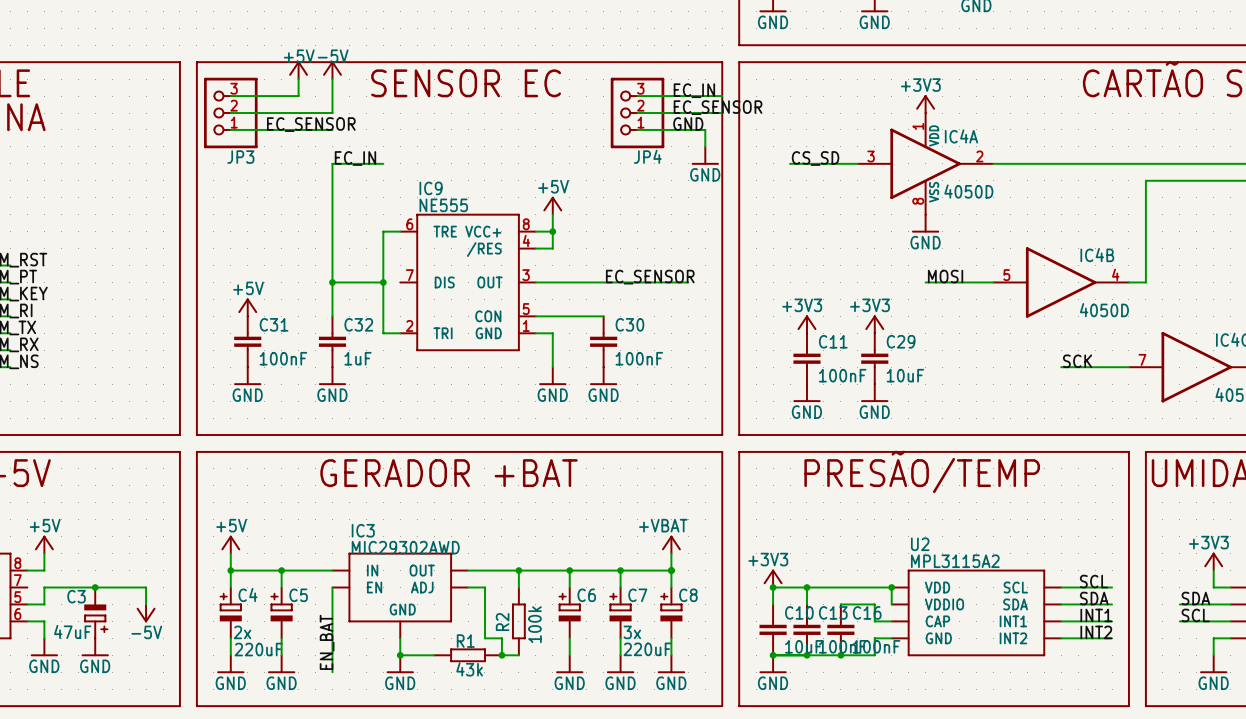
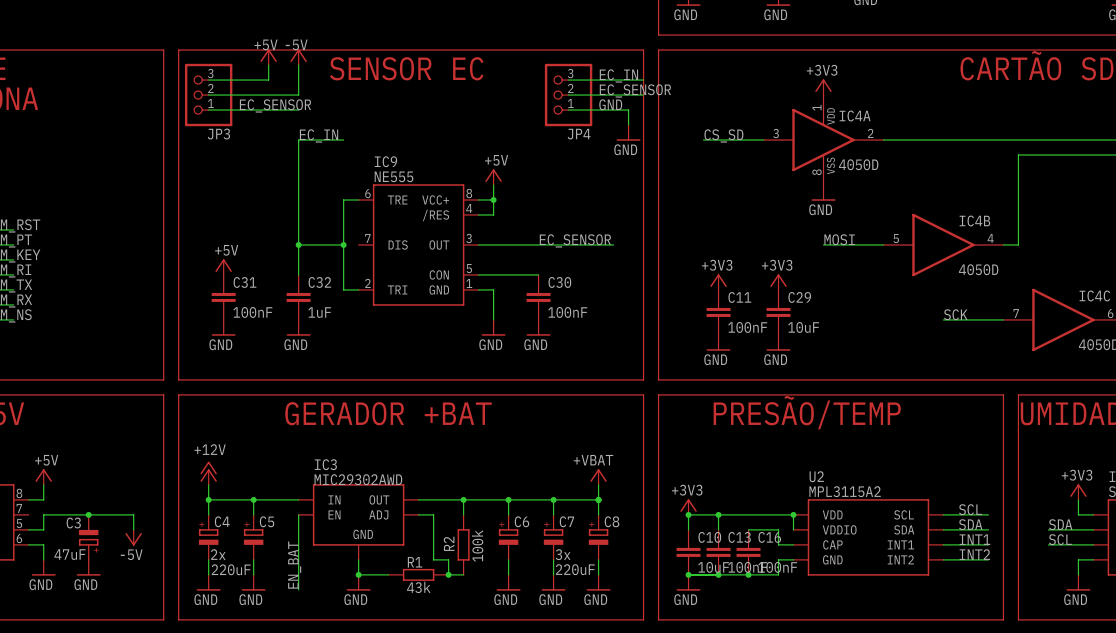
power symbol: +5V (230, 544) -> +12V (208, 473)

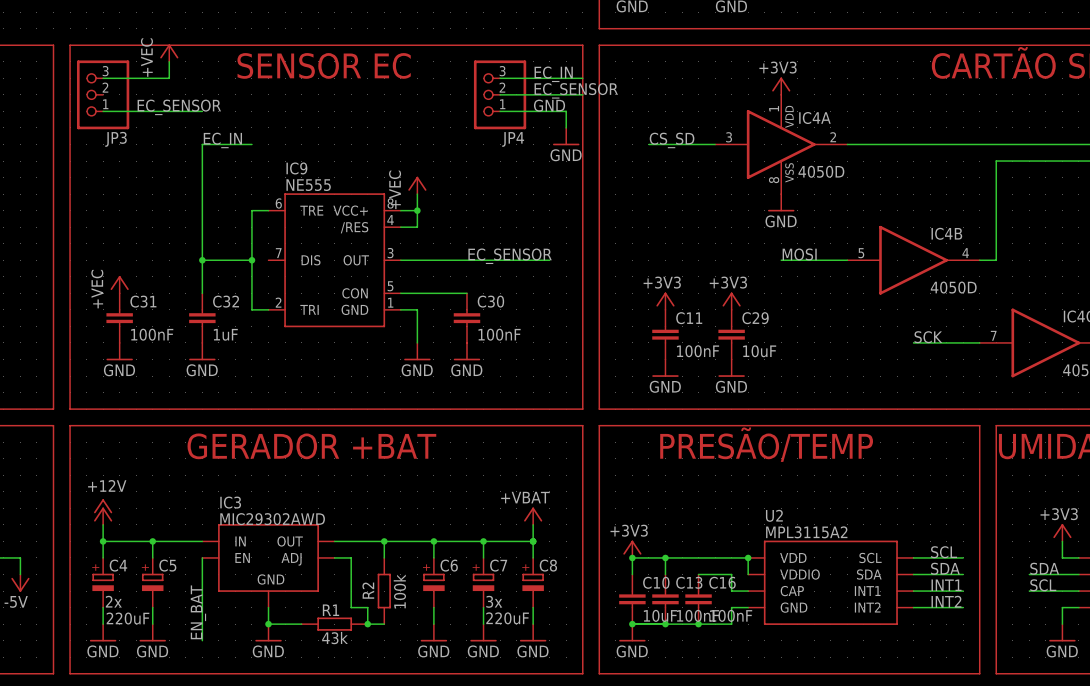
power symbol: +5V (268, 57) -> +VEC (169, 53)
power symbol: -5V (298, 57) -> none
wire: (298, 65) (298, 95) (208, 95) -> none
power symbol: +5V (493, 177) -> +VEC (417, 185)
power symbol: +5V (223, 267) -> +VEC (119, 284)

